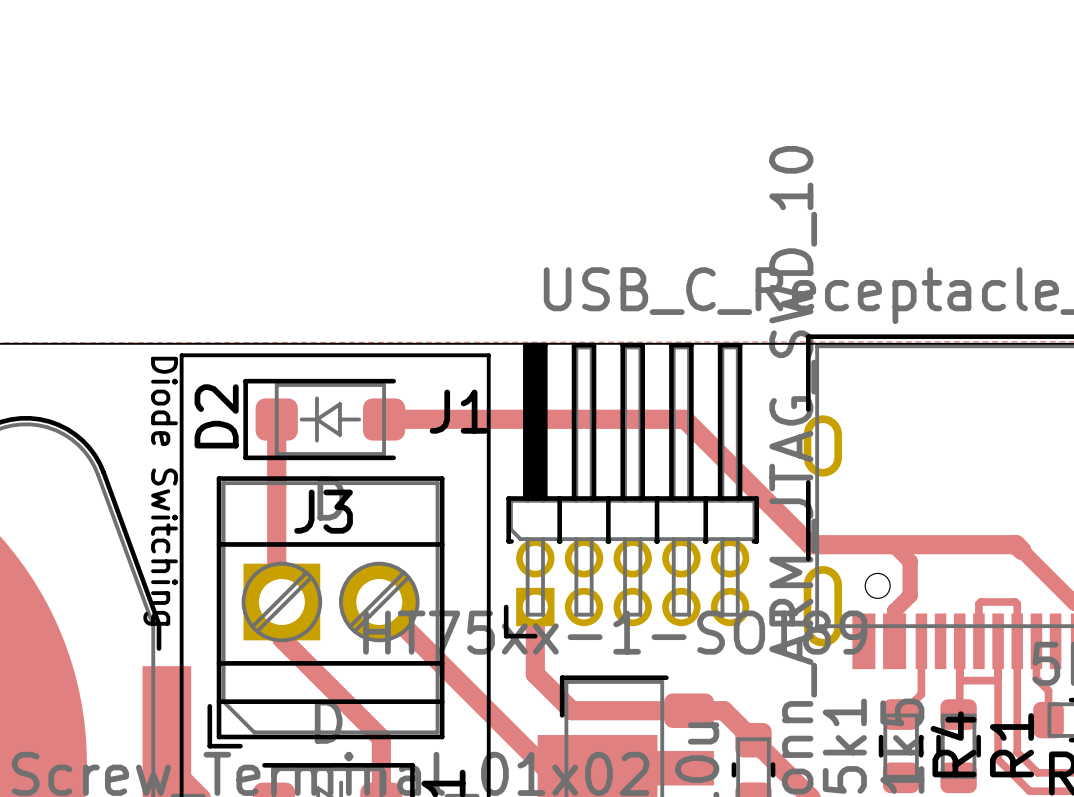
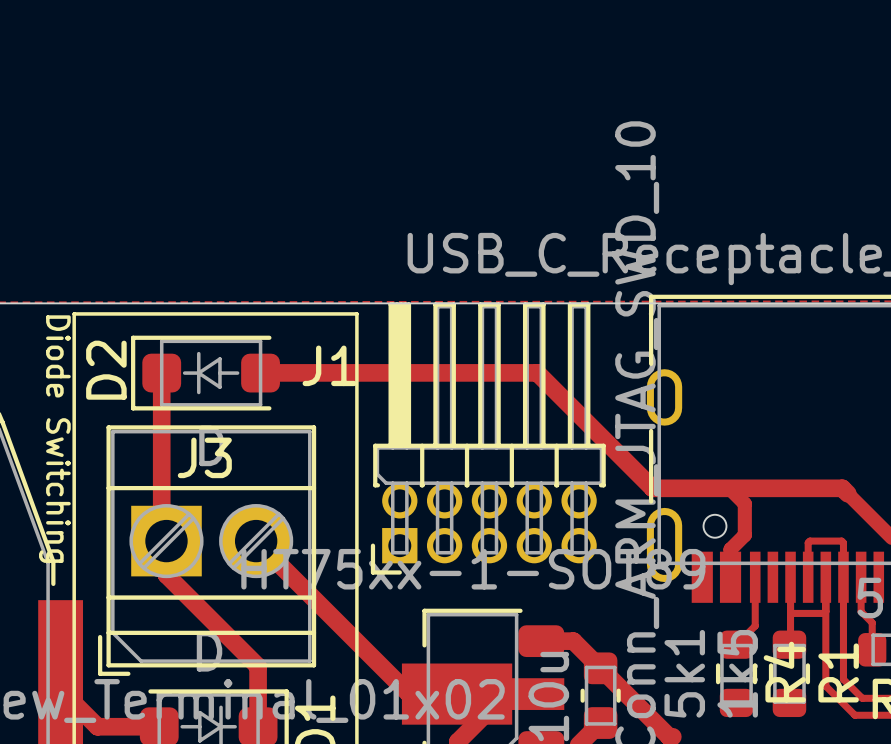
track: (535, 606) (535, 674) (571, 710) (689, 710) -> none

